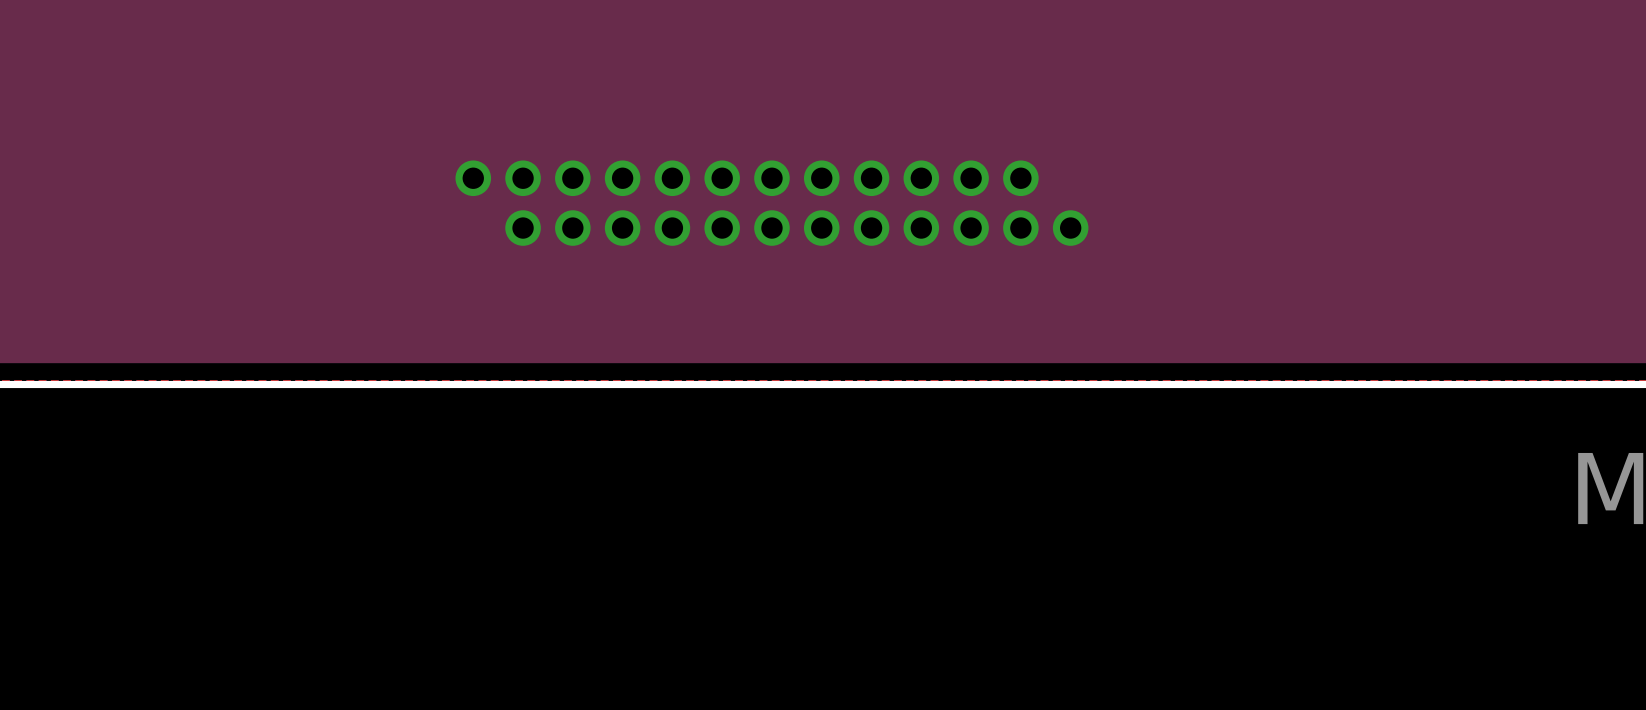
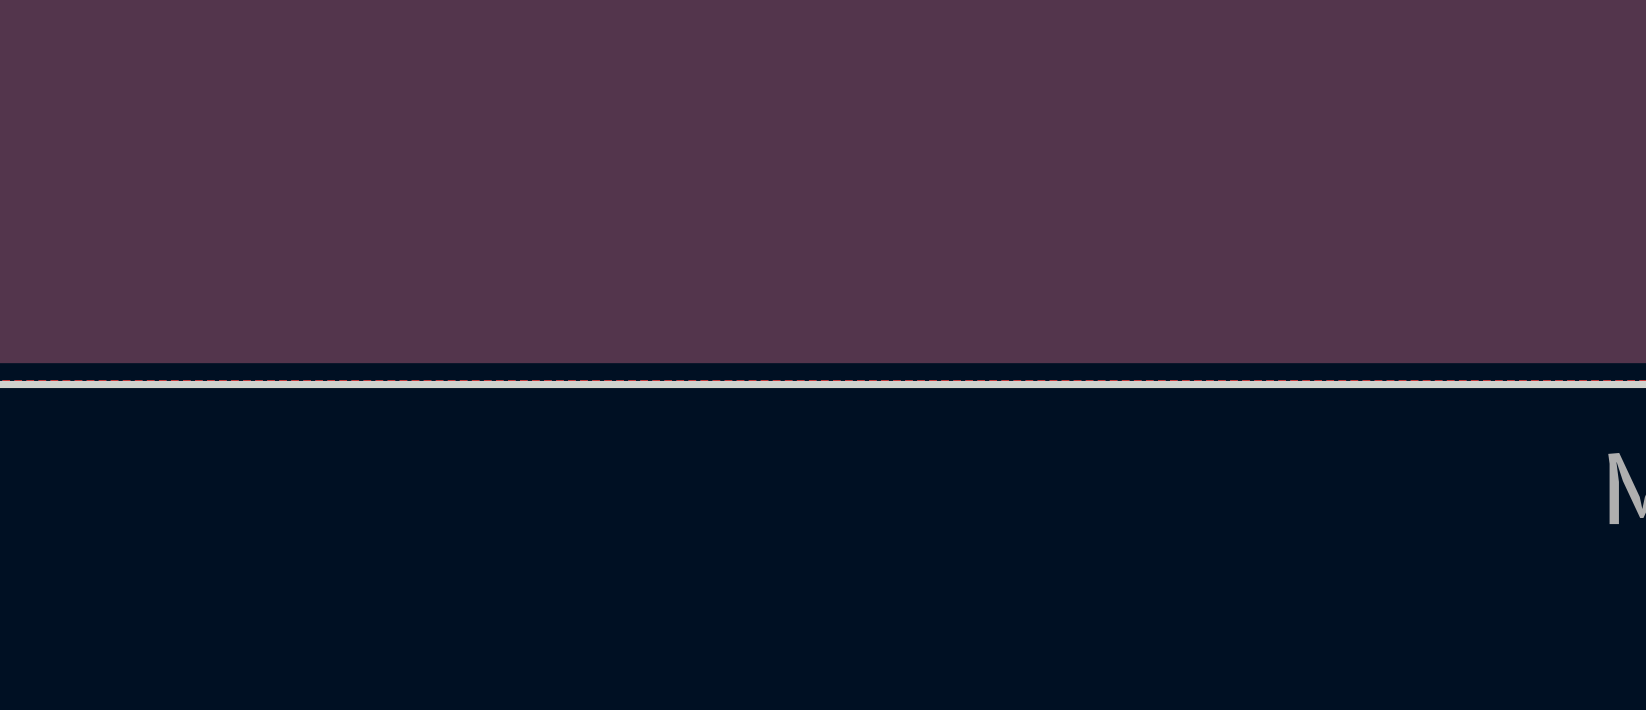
via: (473, 178) -> none
via: (523, 178) -> none
via: (572, 178) -> none
via: (622, 178) -> none
via: (672, 178) -> none
via: (722, 178) -> none
via: (771, 178) -> none
via: (821, 178) -> none
via: (871, 178) -> none
via: (921, 178) -> none
via: (971, 178) -> none
via: (1020, 178) -> none
via: (523, 228) -> none
via: (572, 228) -> none
via: (622, 228) -> none
via: (672, 228) -> none
via: (722, 228) -> none
via: (771, 228) -> none
via: (821, 228) -> none
via: (871, 228) -> none
via: (921, 228) -> none
via: (971, 228) -> none
via: (1020, 228) -> none
via: (1070, 228) -> none

